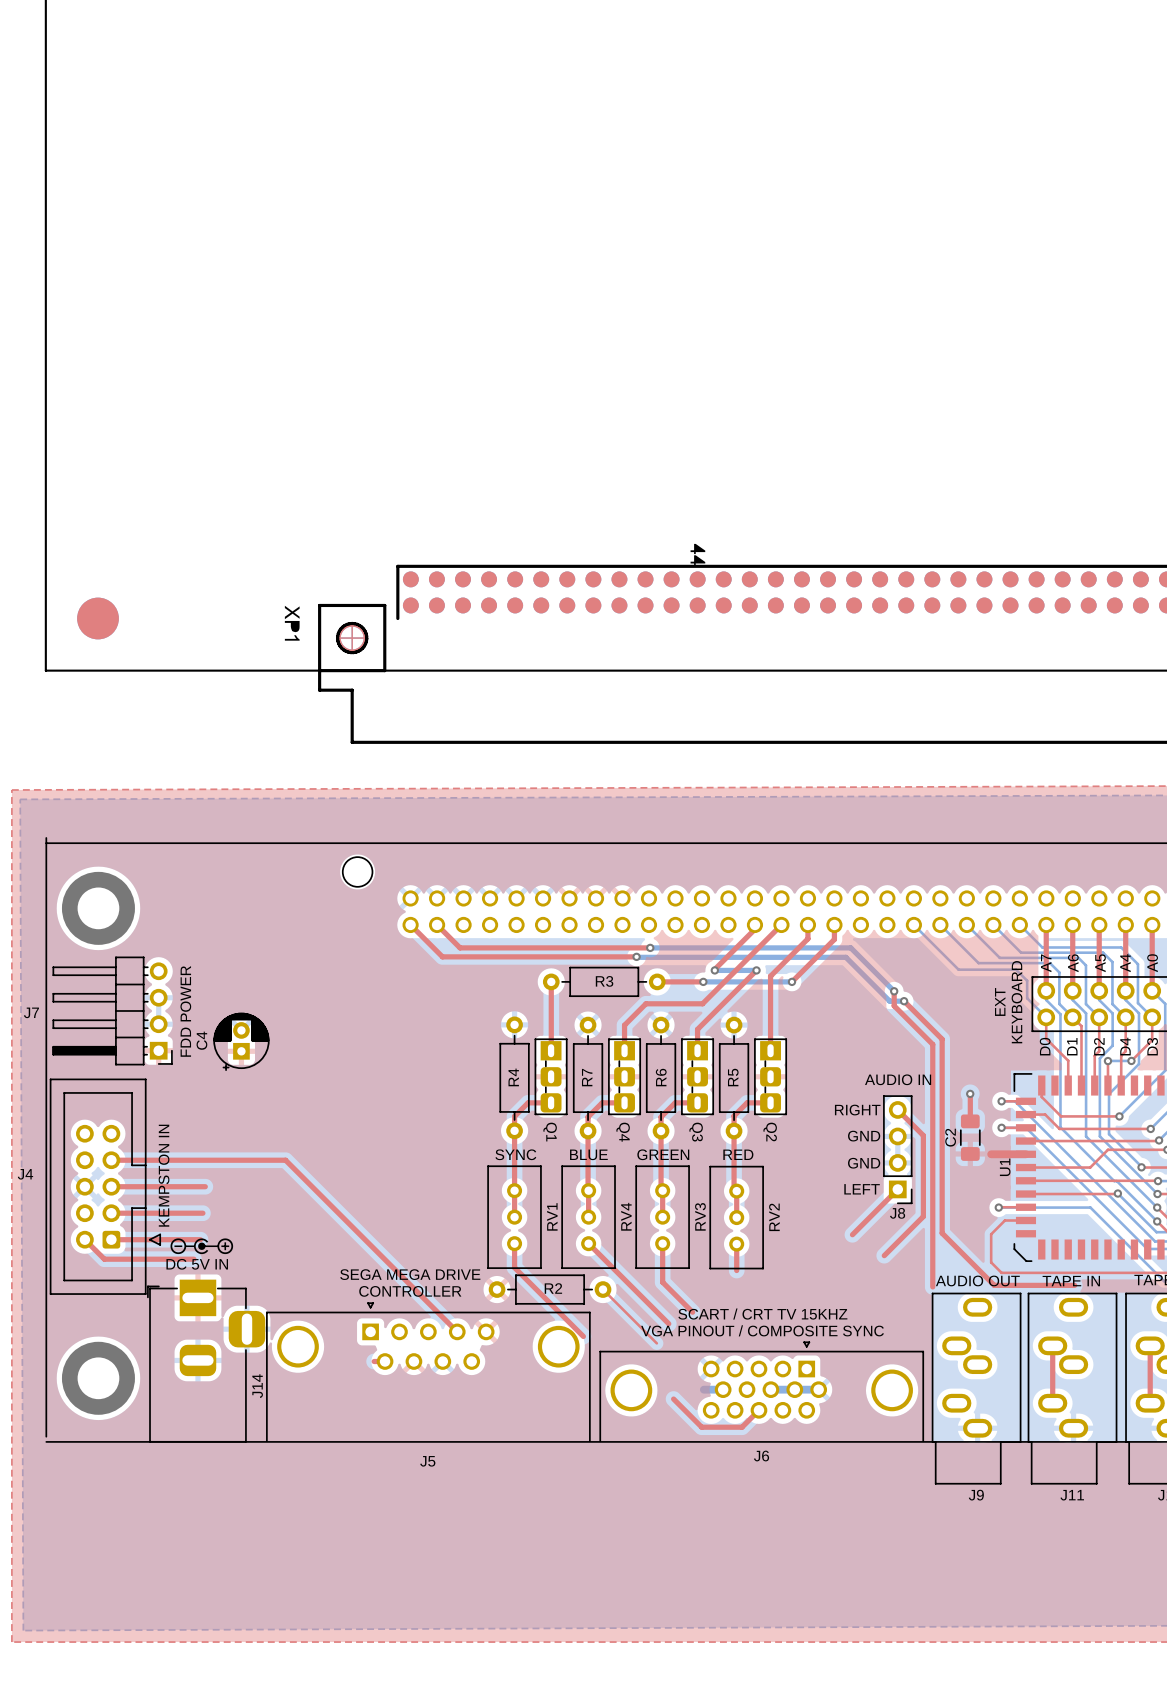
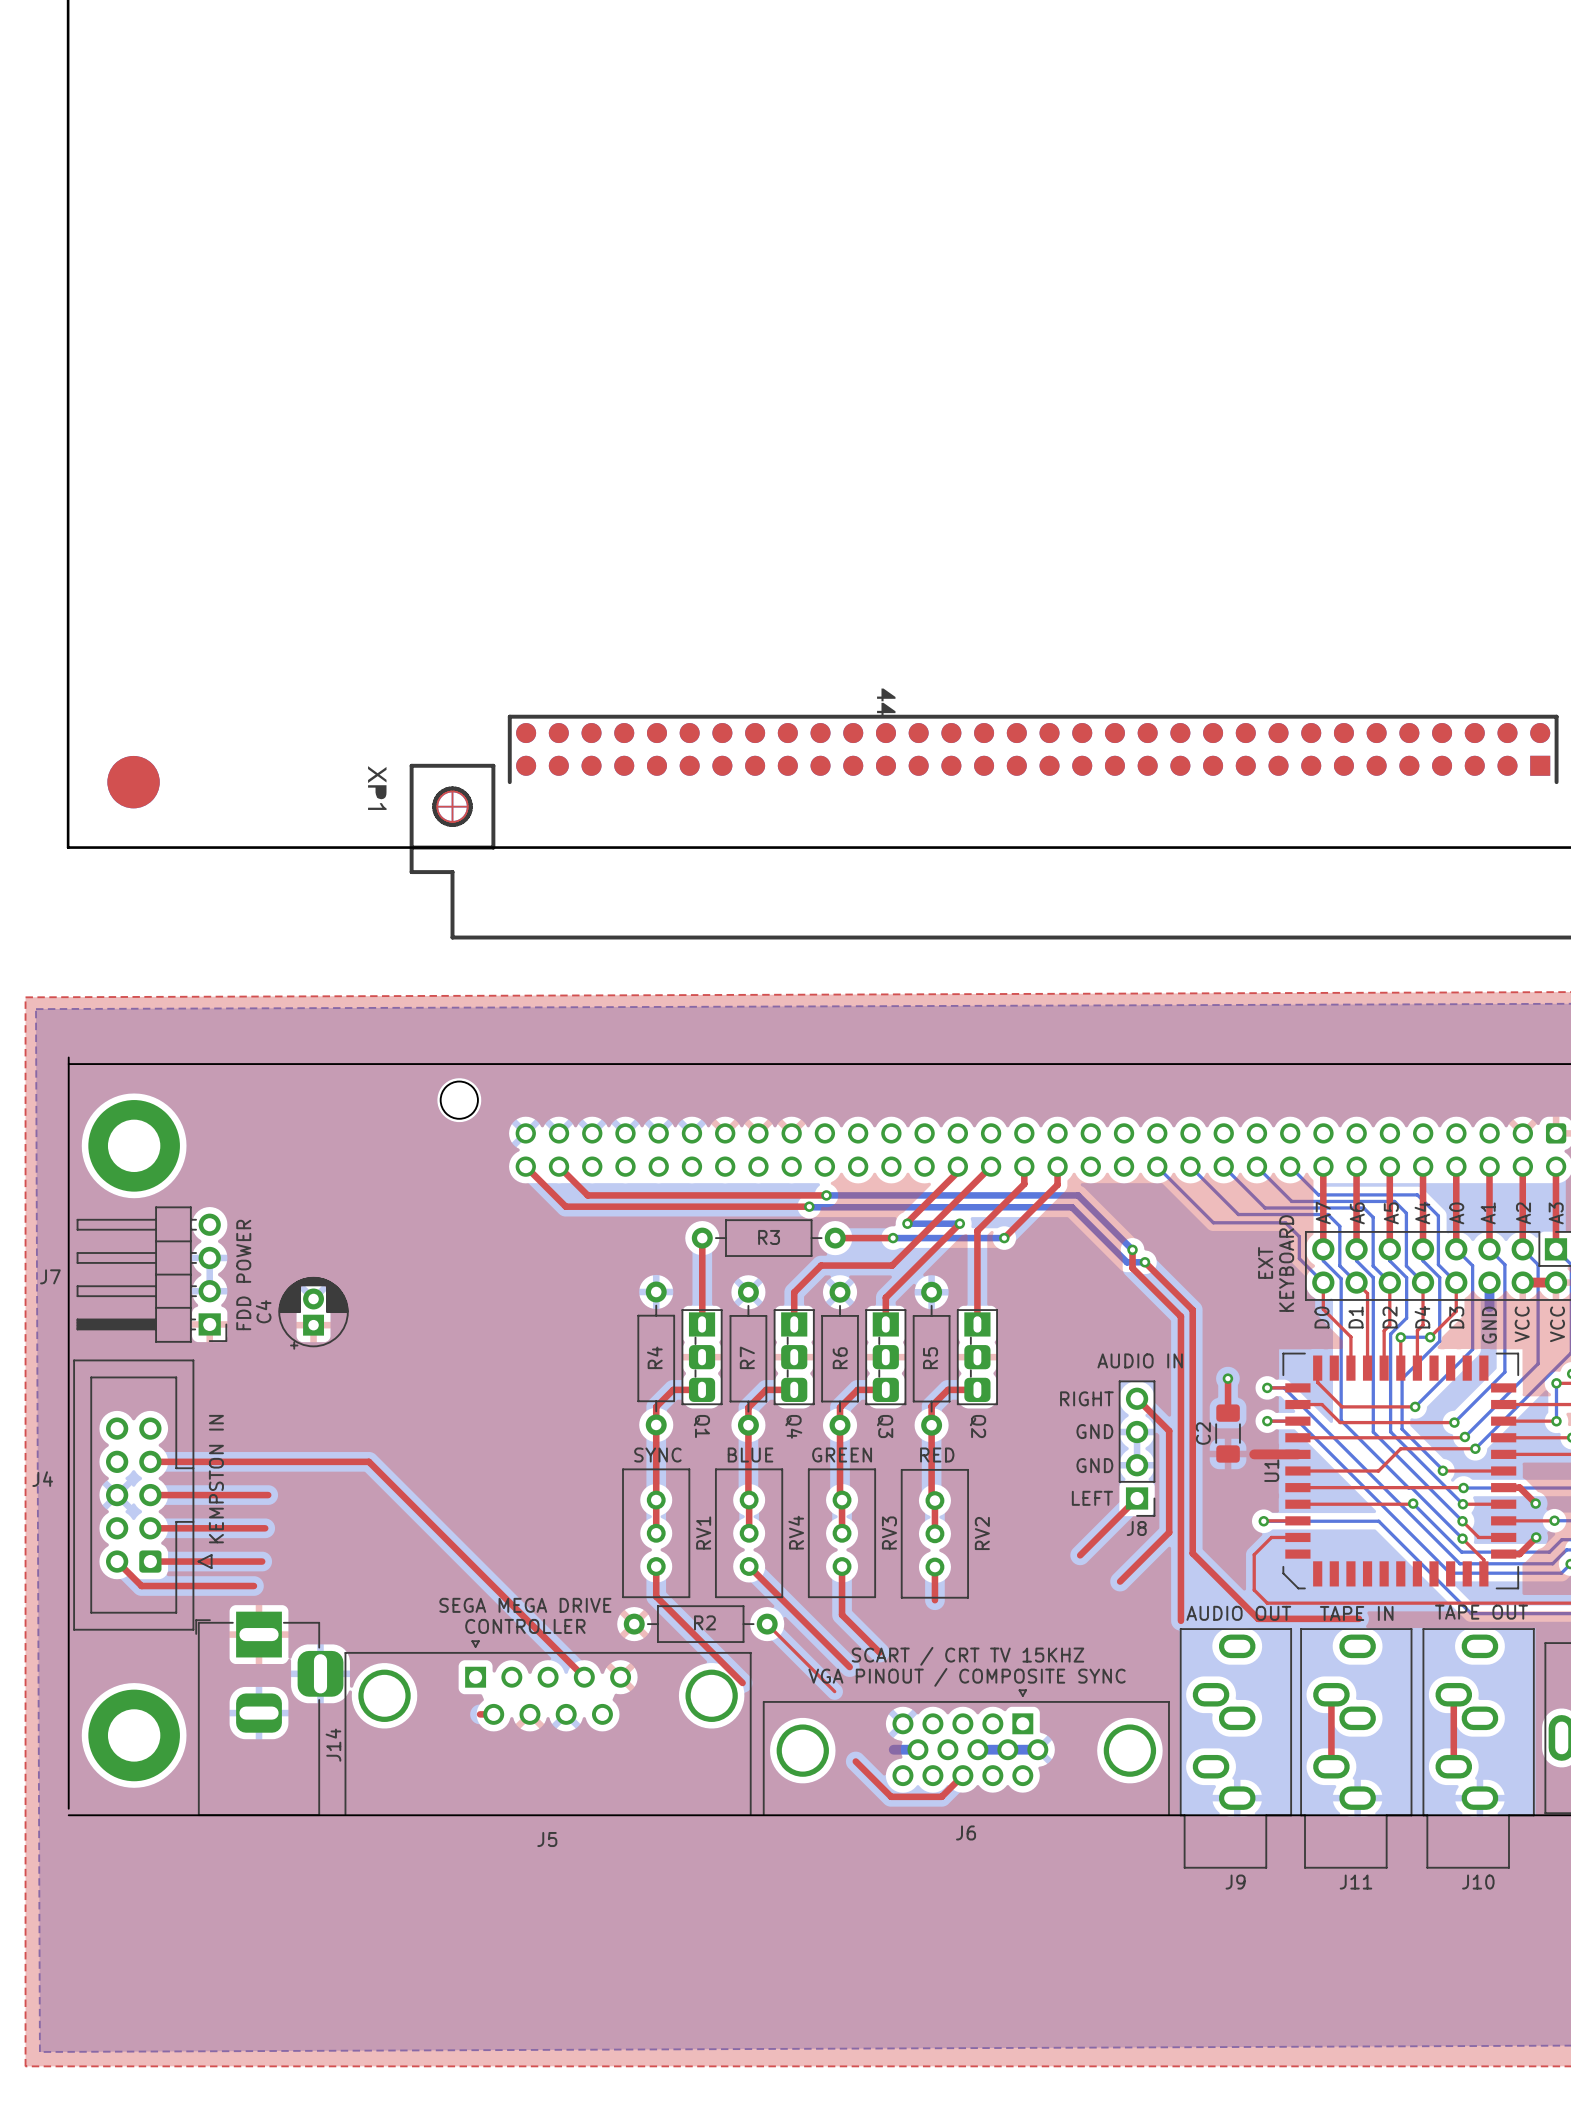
drawing: [170, 1238, 234, 1255] -> none
text: DC 5V IN (197, 1264) -> none

